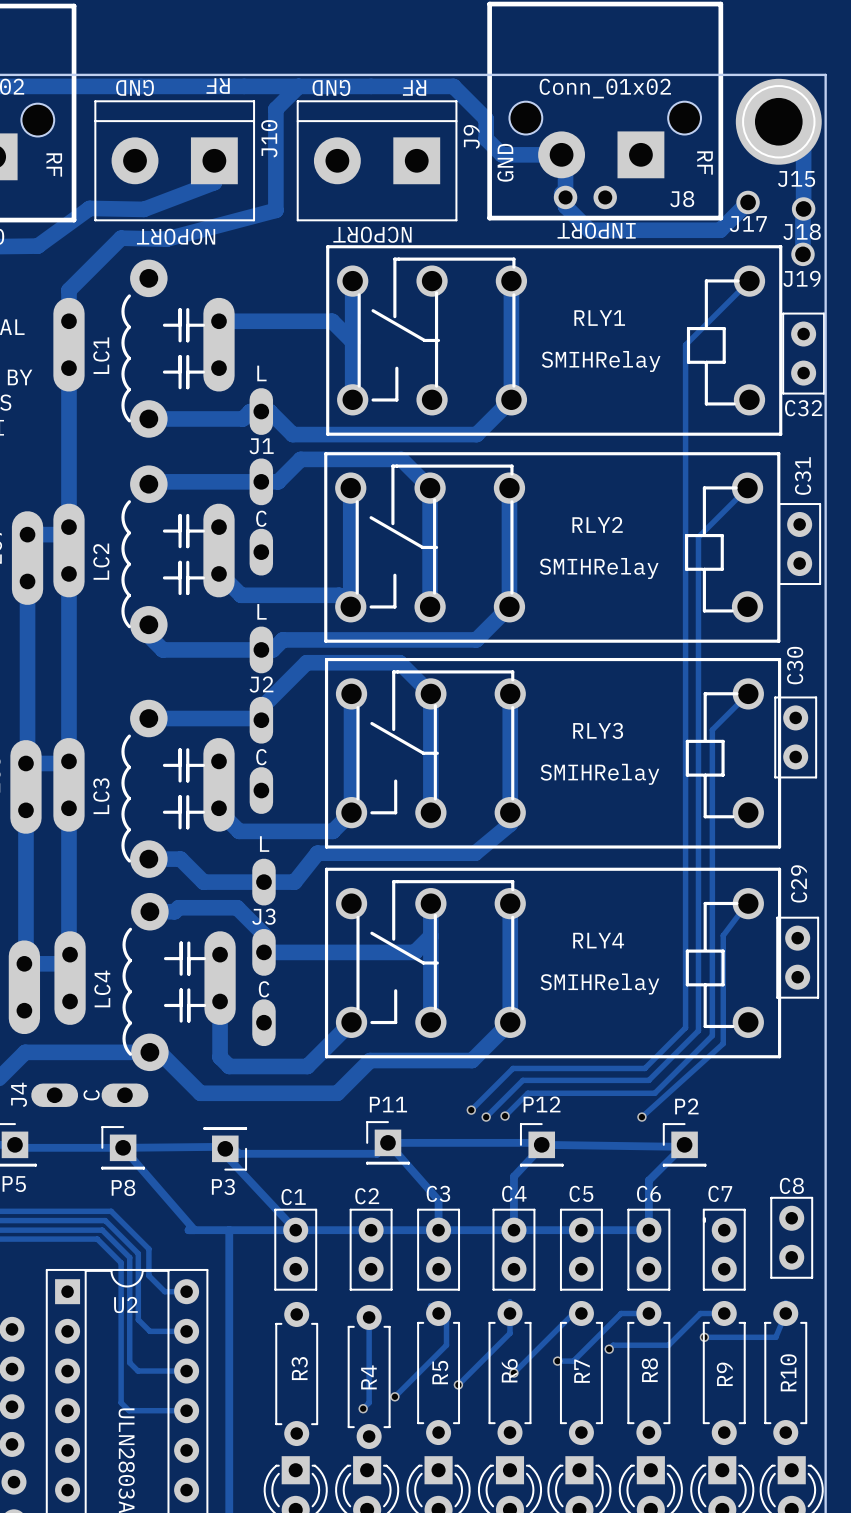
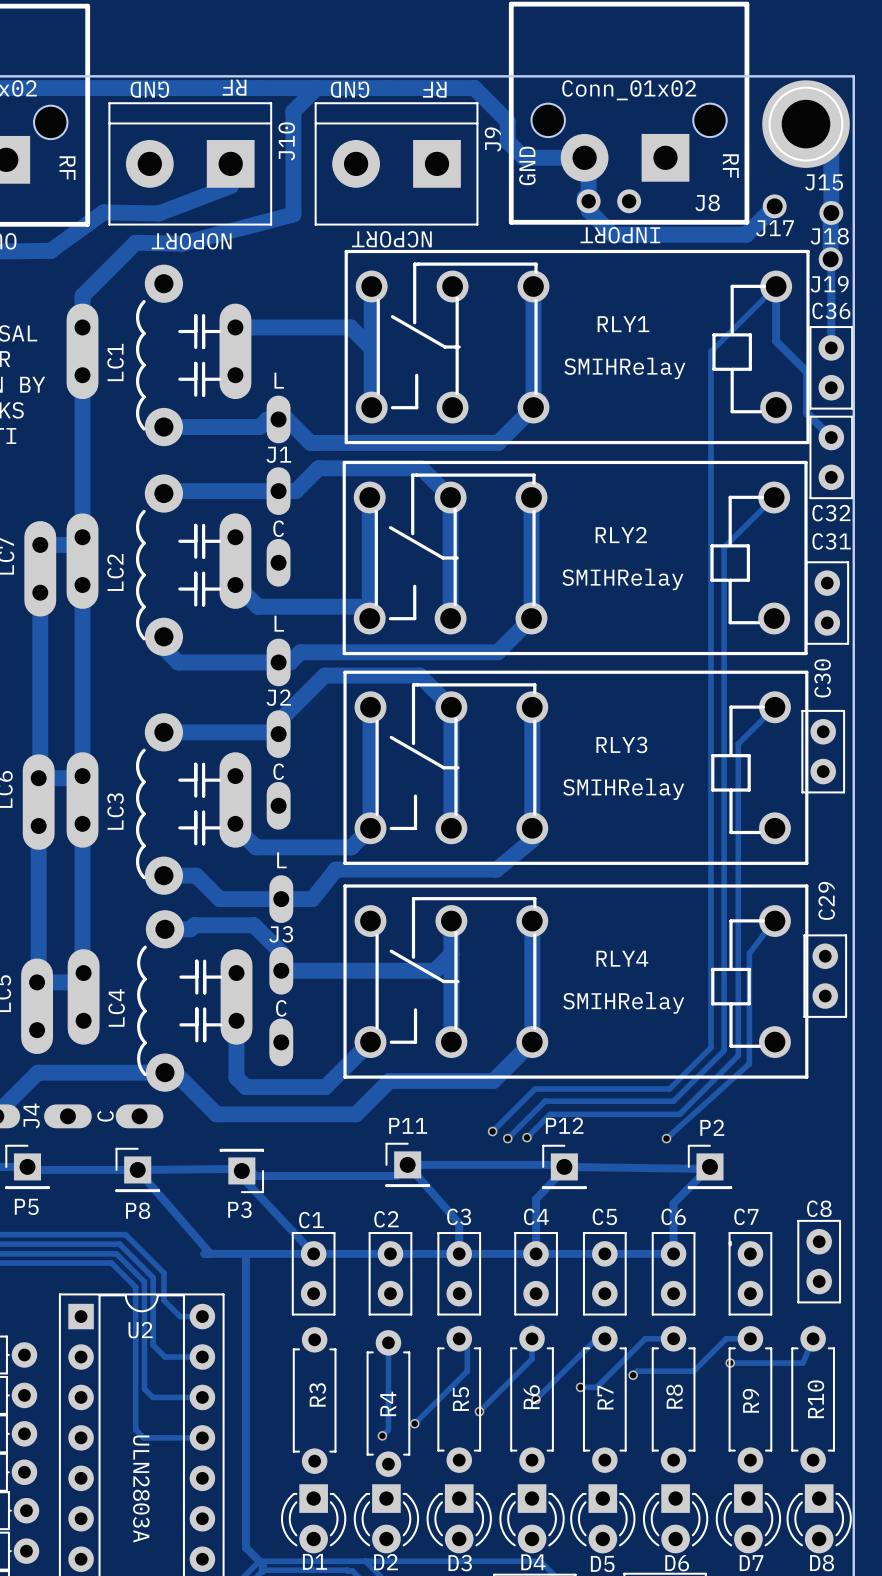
track: none -> (831, 259) (831, 347)
track: none -> (776, 286) (776, 341) (807, 372) (807, 413) (831, 437) (831, 428)
C32 position: (803, 353) -> (831, 457)
C36: none -> (831, 367)
C31 name rotation: 0° (803, 475) -> 90° clockwise (831, 541)
C31 position: (799, 544) -> (827, 603)

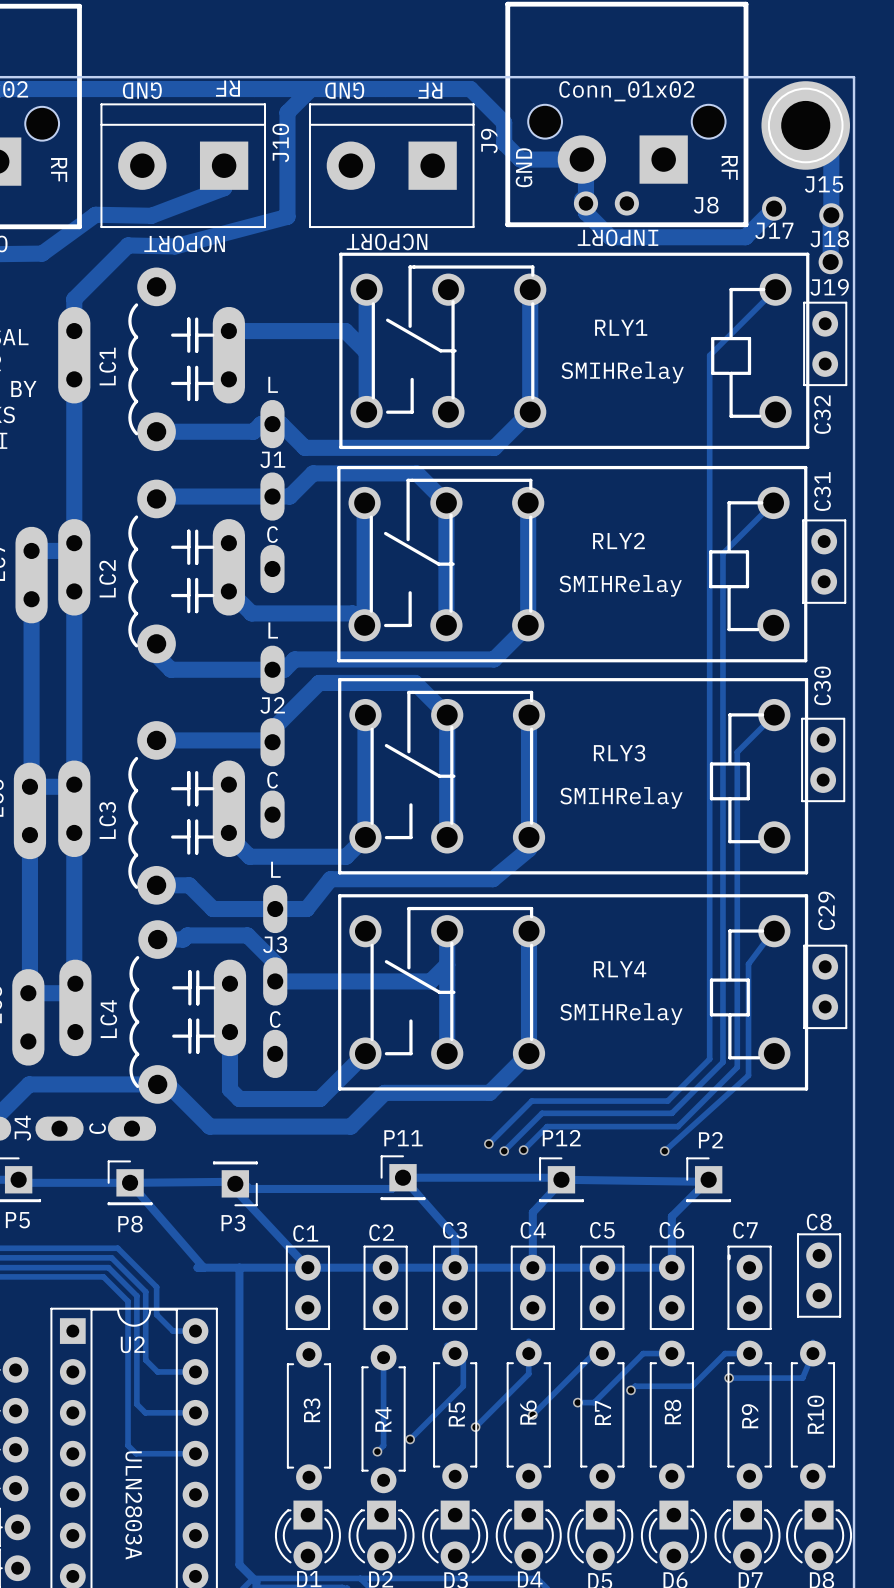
track: (830, 259) (831, 347) -> none
track: (776, 286) (776, 341) (807, 372) (807, 413) (831, 437) (831, 428) -> none
C36: (831, 367) -> none
C32 position: (831, 457) -> (825, 343)
C32 name rotation: 0° (831, 513) -> 90° counterclockwise (822, 414)
C31 name rotation: 0° (831, 541) -> 90° counterclockwise (822, 491)
C31 position: (827, 603) -> (824, 561)

